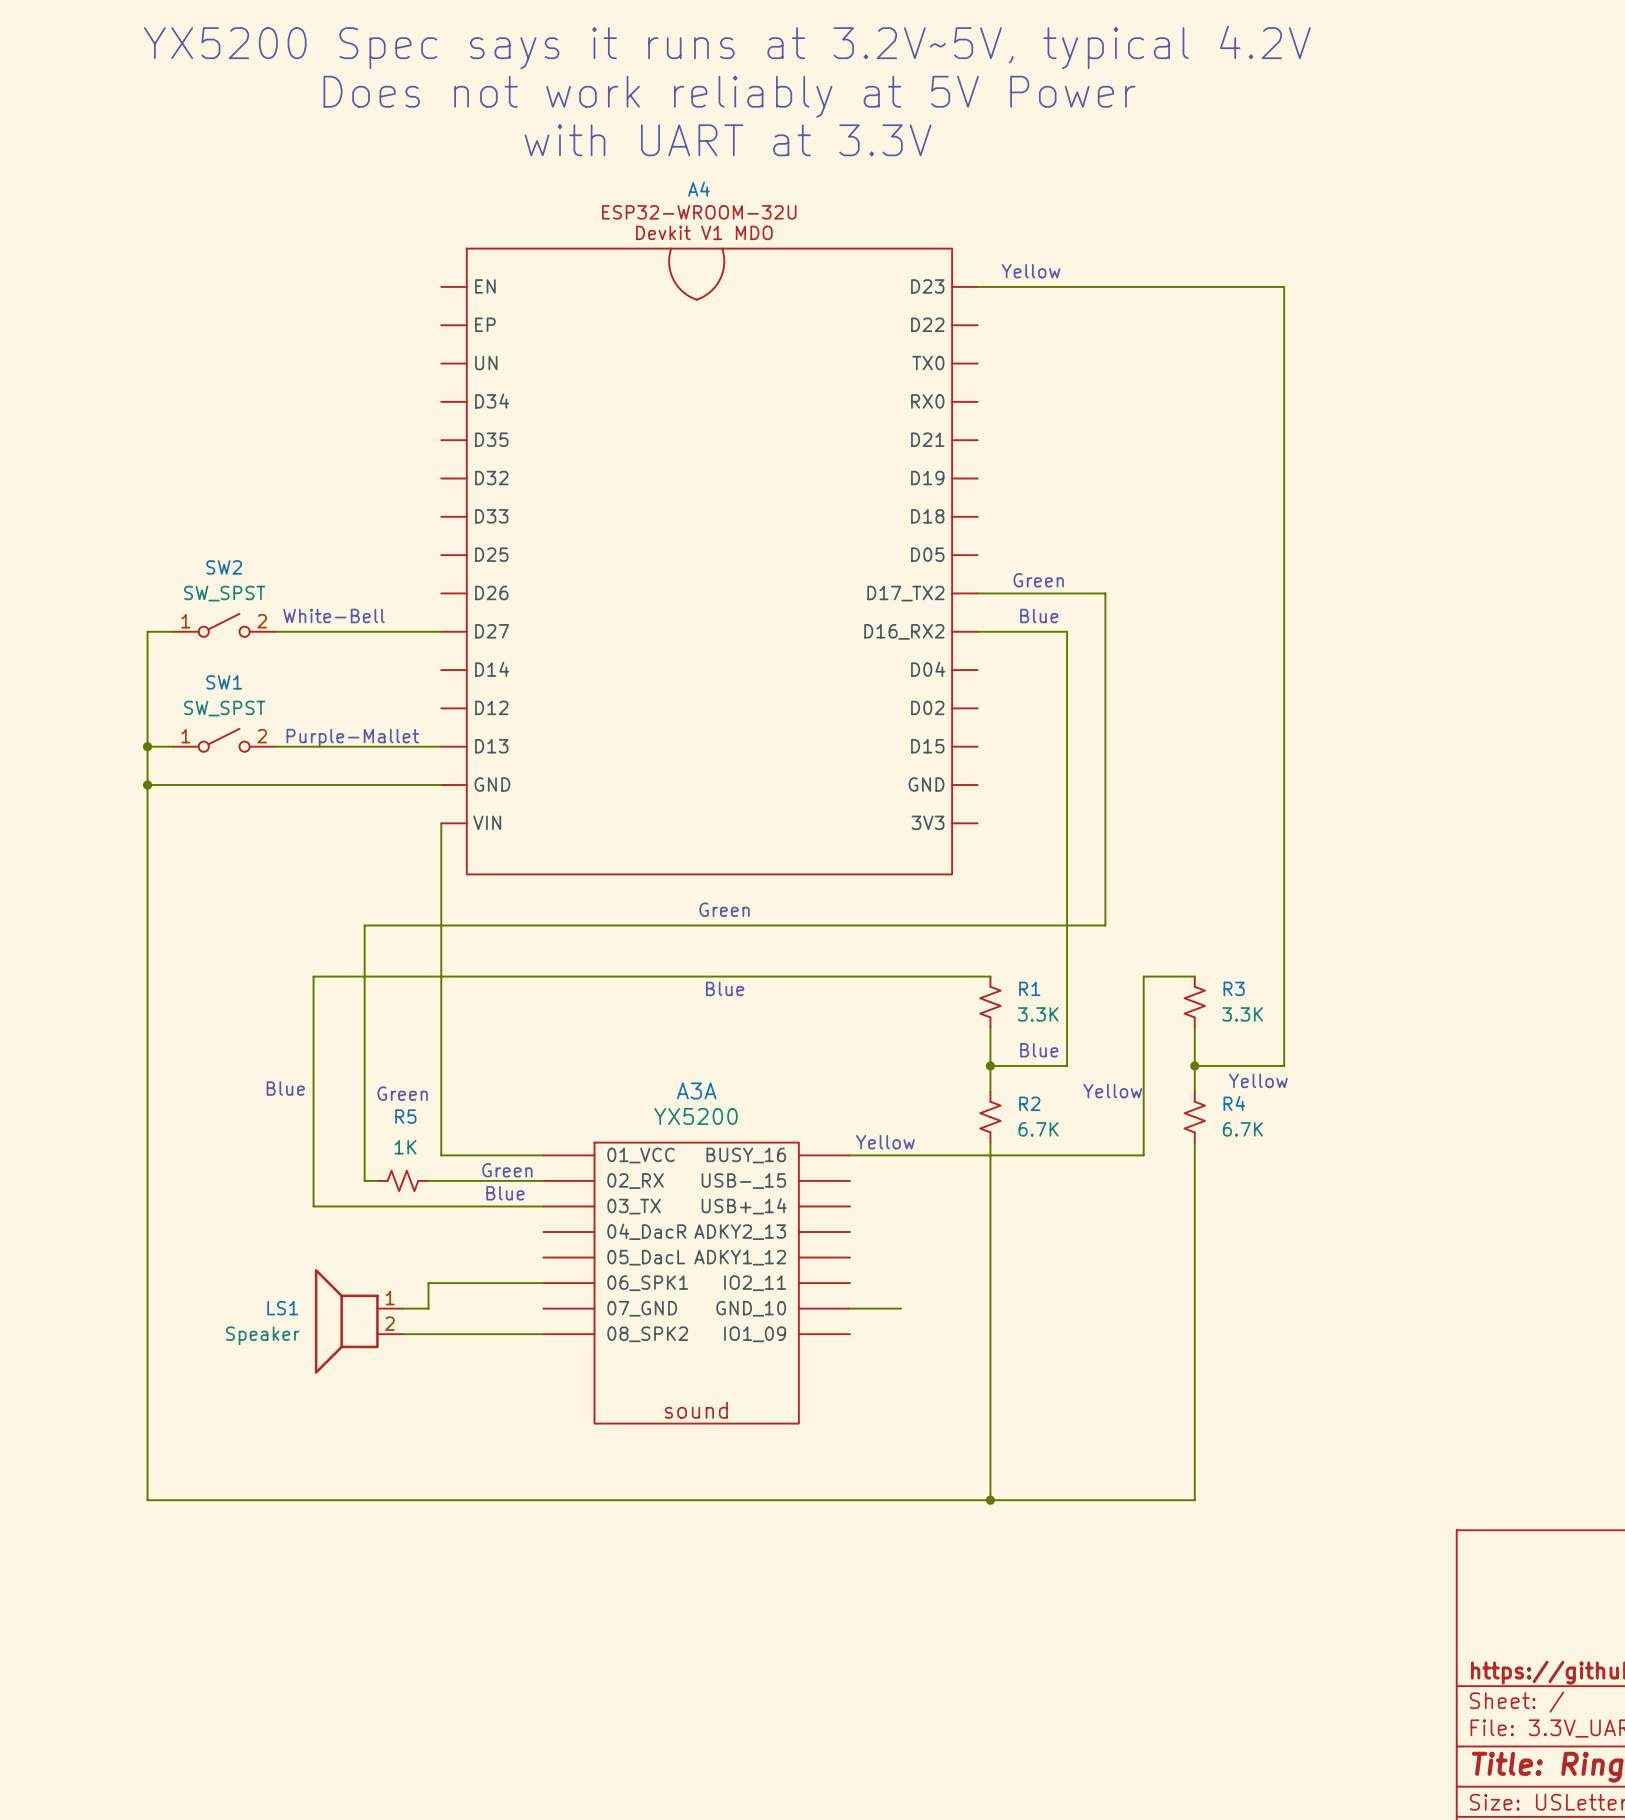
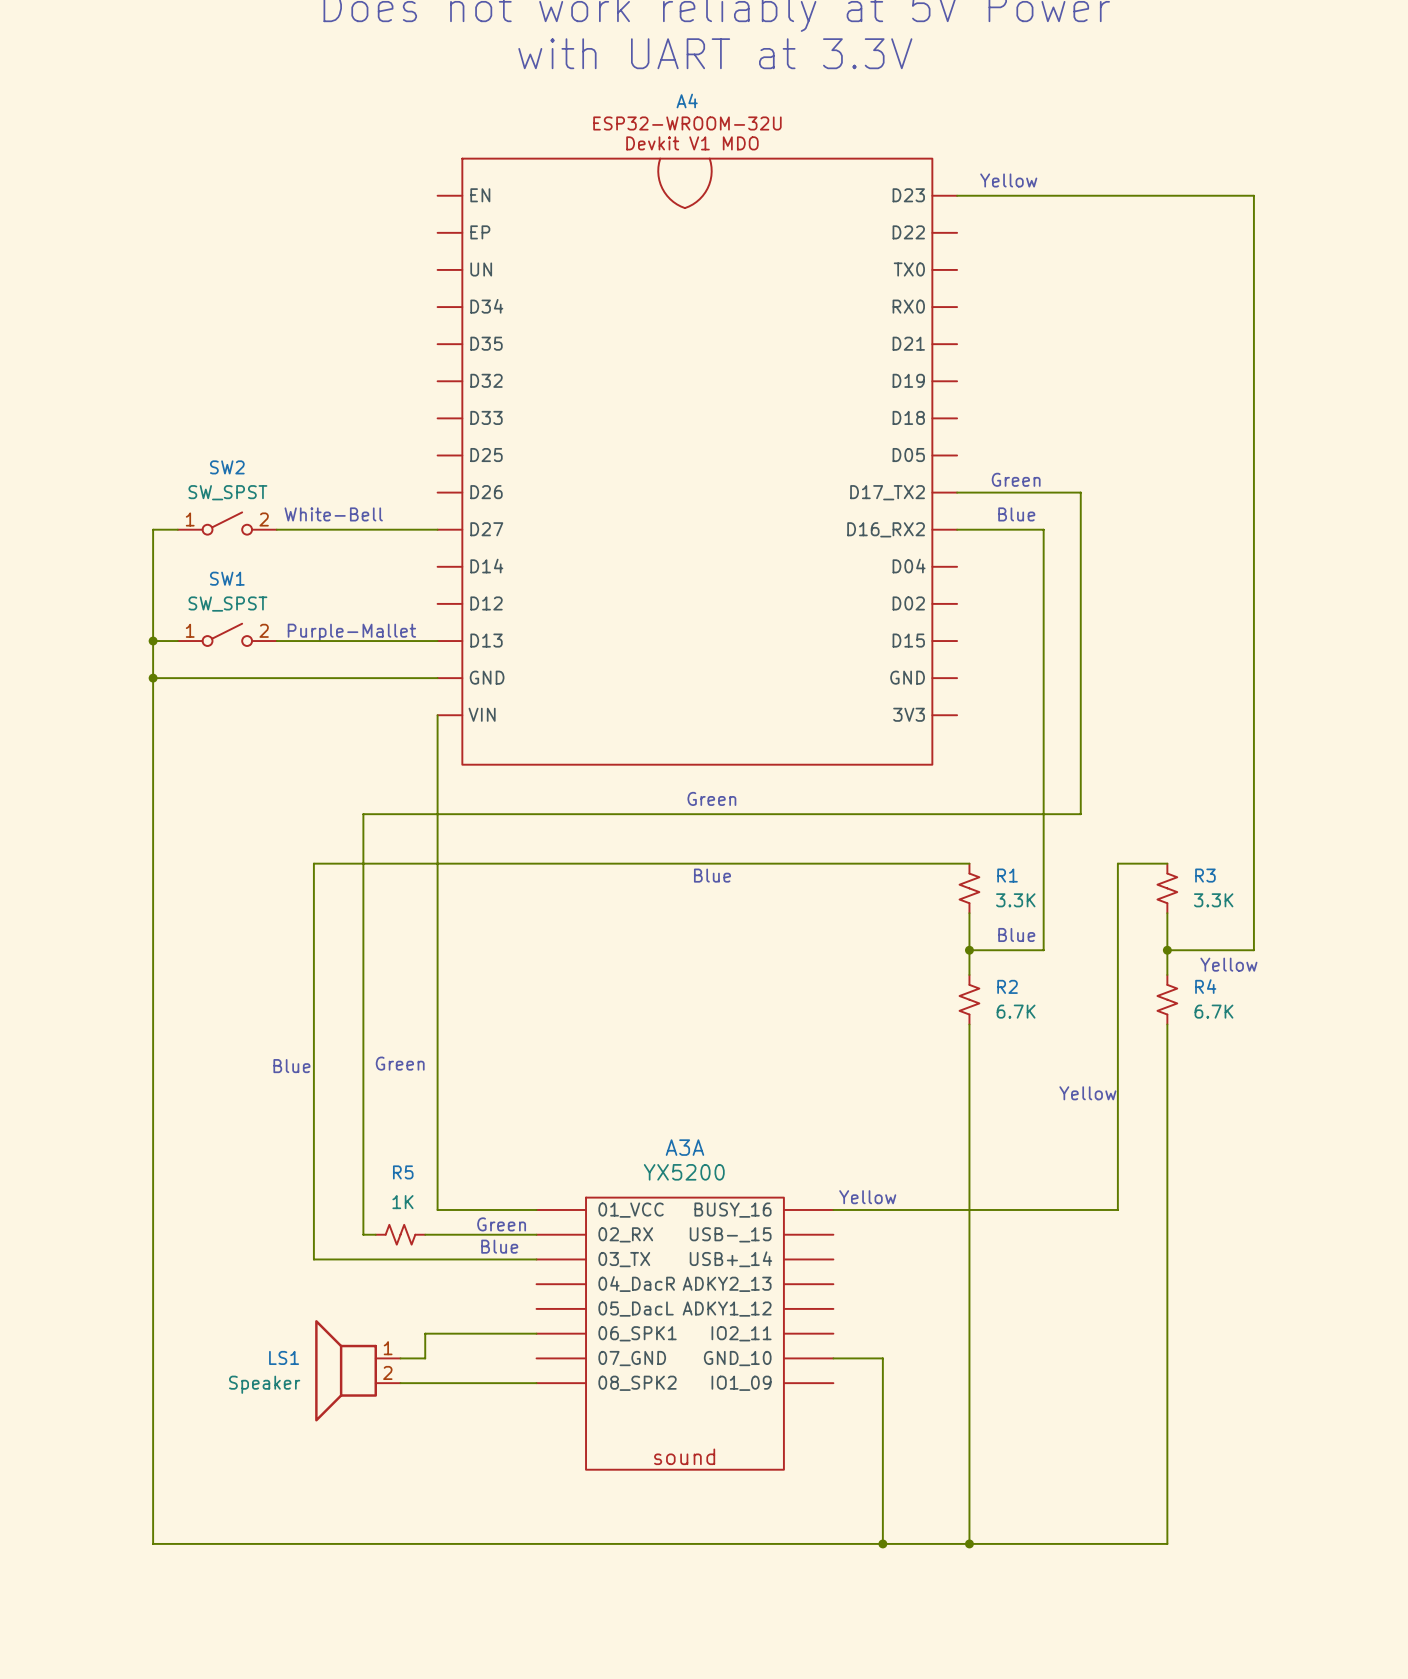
text position: Blue (285, 1088) -> Blue (291, 1066)
text: Yellow (1112, 1091) -> none
text: Green (402, 1093) -> none
text: Yellow (885, 1142) -> none
wire: (441, 1155) (543, 1155) -> none
wire: (849, 1155) (1143, 1155) -> (833, 1209) (1117, 1209) (1117, 1036)
text: Green (507, 1170) -> none
wire: (364, 1180) (377, 1180) -> (363, 1061) (363, 1234) (375, 1234)
R5 position: (402, 1180) -> (400, 1234)
wire: (428, 1180) (543, 1180) -> (425, 1234) (536, 1234)
text: none -> Green (400, 1063)
text: Blue (505, 1193) -> none
wire: (313, 1206) (543, 1206) -> (313, 1086) (313, 1259) (536, 1259)
text: none -> Yellow (1087, 1093)
wire: (543, 1283) (428, 1283) (428, 1308) (402, 1308) -> (536, 1333) (425, 1333) (425, 1358) (400, 1358)
A3A position: (696, 1283) -> (684, 1333)
wire: (849, 1308) (901, 1308) -> none
text: none -> Yellow (867, 1197)
LS1 position: (358, 1321) -> (357, 1370)
wire: (402, 1334) (441, 1334) -> (437, 1036) (437, 1209)
text: none -> Green (501, 1224)
text: none -> Blue (499, 1246)
wire: none -> (833, 1358) (882, 1358) (882, 1543)
wire: (147, 1500) (1194, 1500) -> (153, 1370) (153, 1543) (1167, 1543) (1167, 1370)
wire: none -> (969, 1370) (969, 1543)
junction: (990, 1500) -> none
wire: none -> (400, 1383) (536, 1383)
junction: none -> (882, 1543)
junction: none -> (969, 1543)

